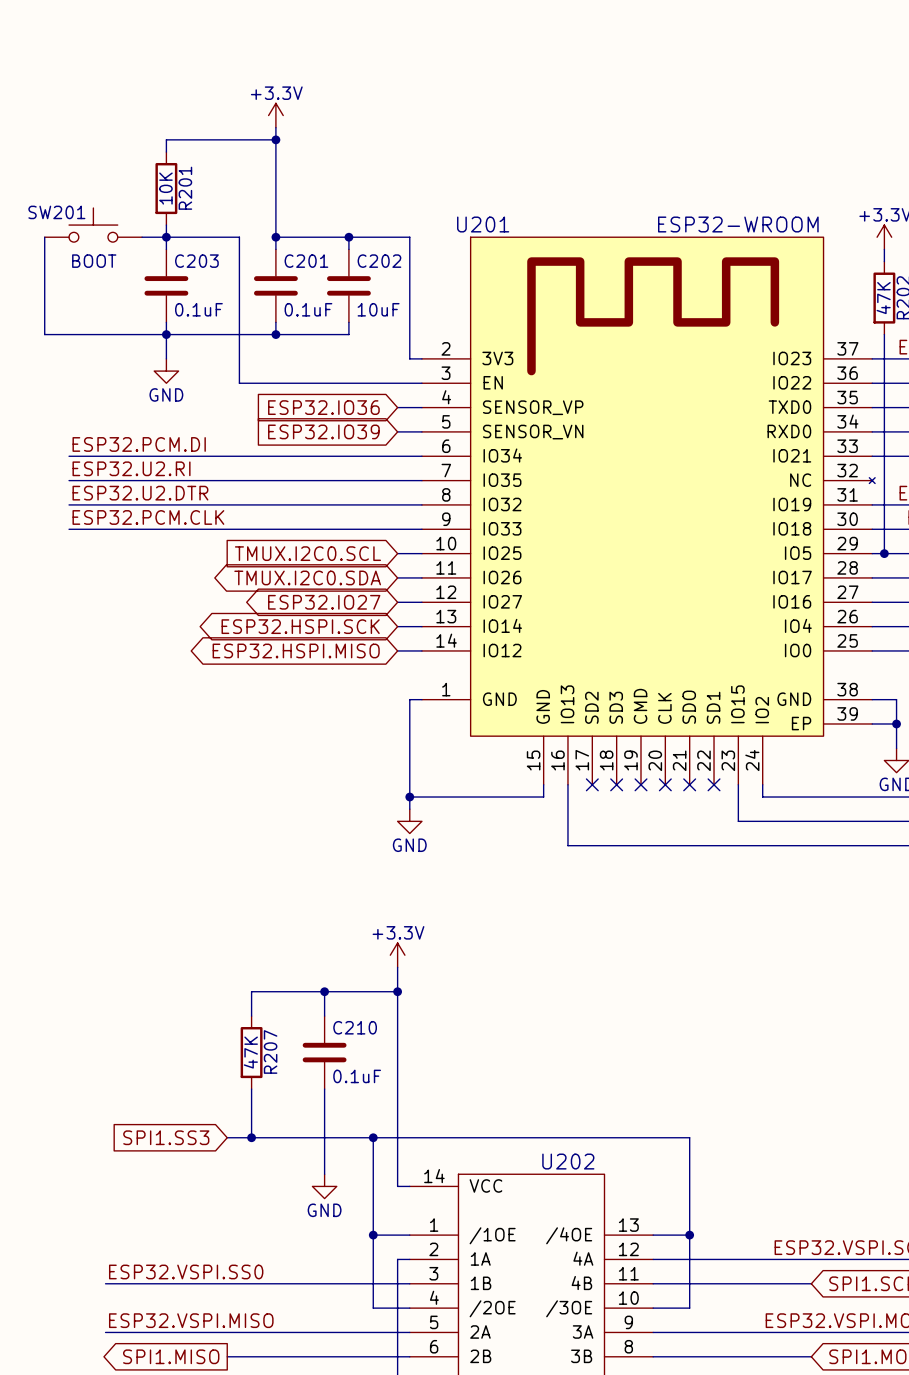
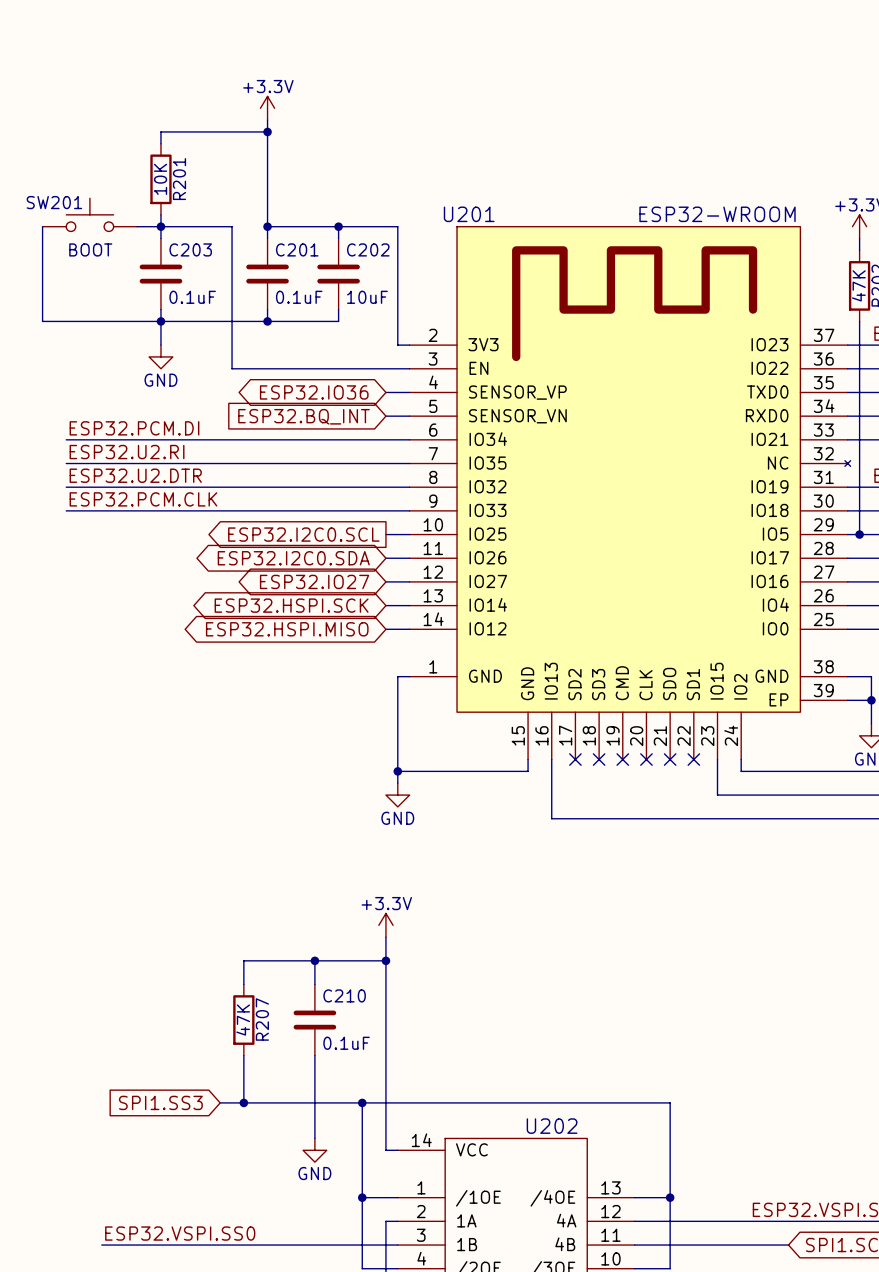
global label shape: input (323, 407) -> bidirectional (314, 392)
global label: ESP32.IO39 (323, 431) -> ESP32.BQ_INT (304, 416)
global label shape: input (307, 553) -> output (303, 534)
global label: TMUX.I2C0.SCL (307, 553) -> ESP32.I2C0.SCL (303, 534)
global label: TMUX.I2C0.SDA (307, 577) -> ESP32.I2C0.SDA (293, 558)

